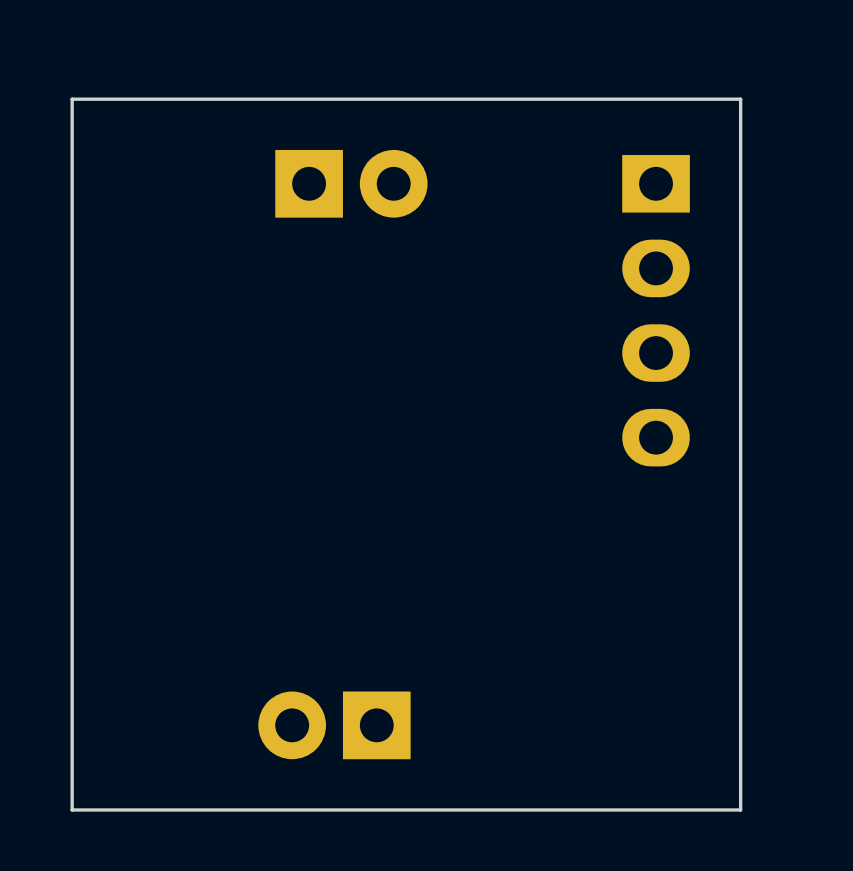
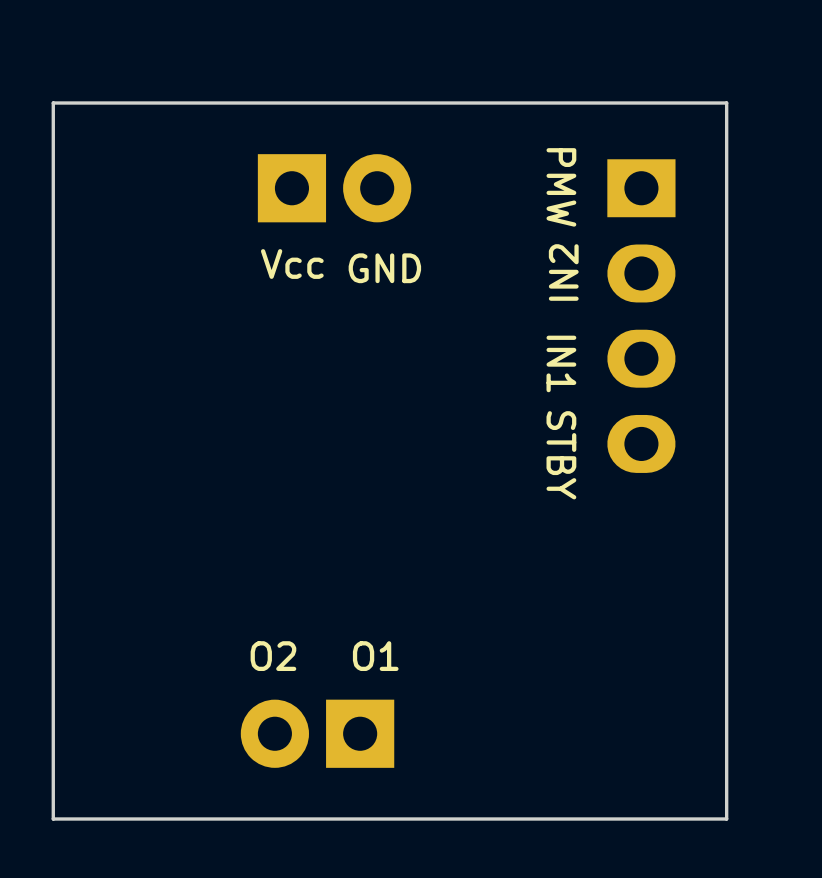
text: none -> PMW (561, 187)
text: none -> Vcc (292, 264)
text: none -> GND (384, 268)
text: none -> IN2 (563, 272)
text: none -> IN1 (561, 363)
text: none -> STBY (561, 455)
text: none -> O2 (273, 656)
text: none -> O1 (375, 656)

